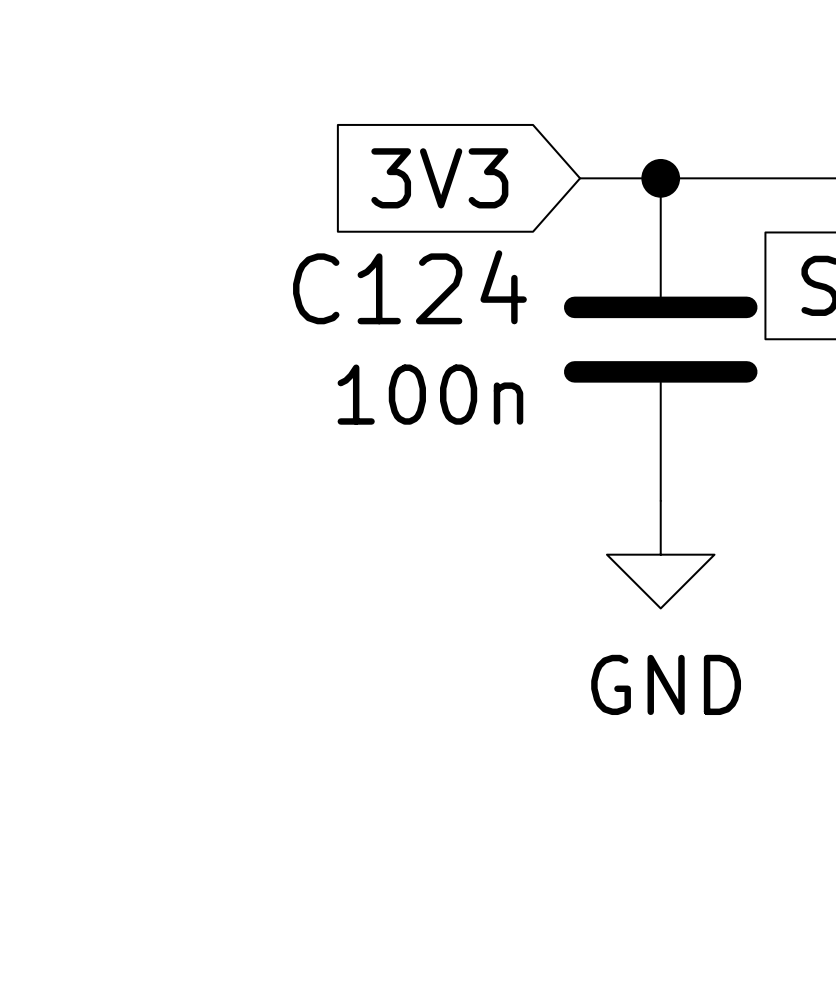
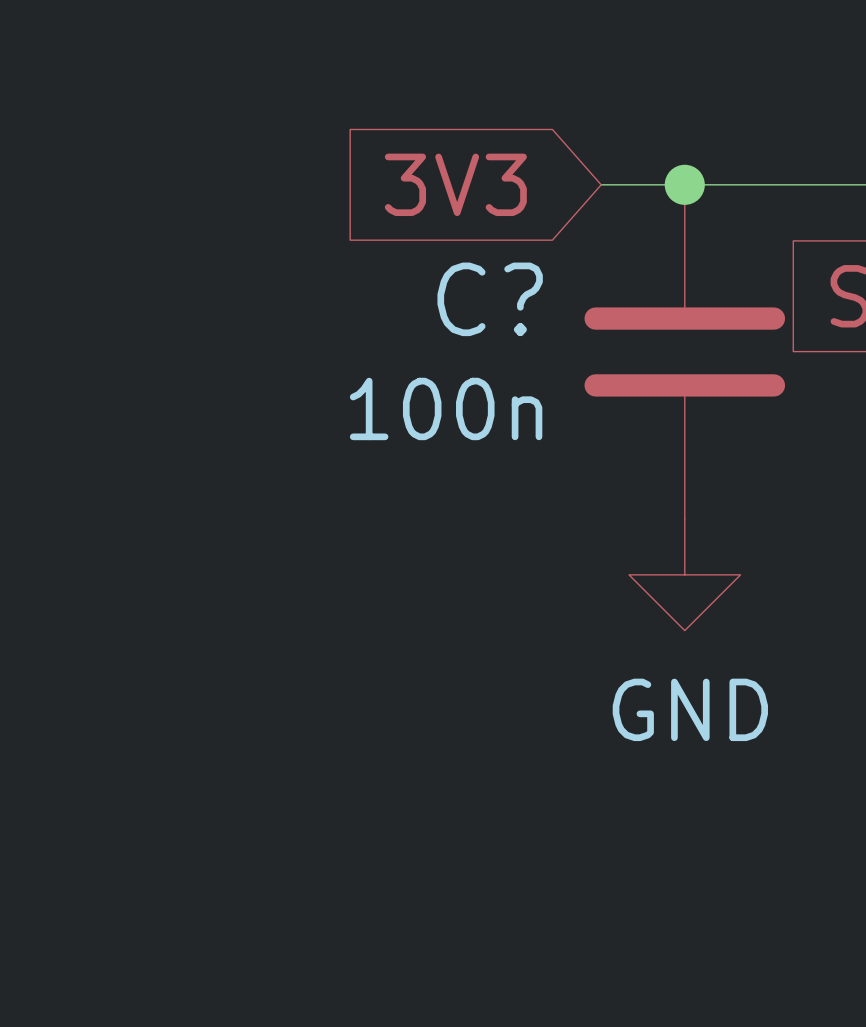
C124 name: C124 (409, 287) -> C? (490, 299)

